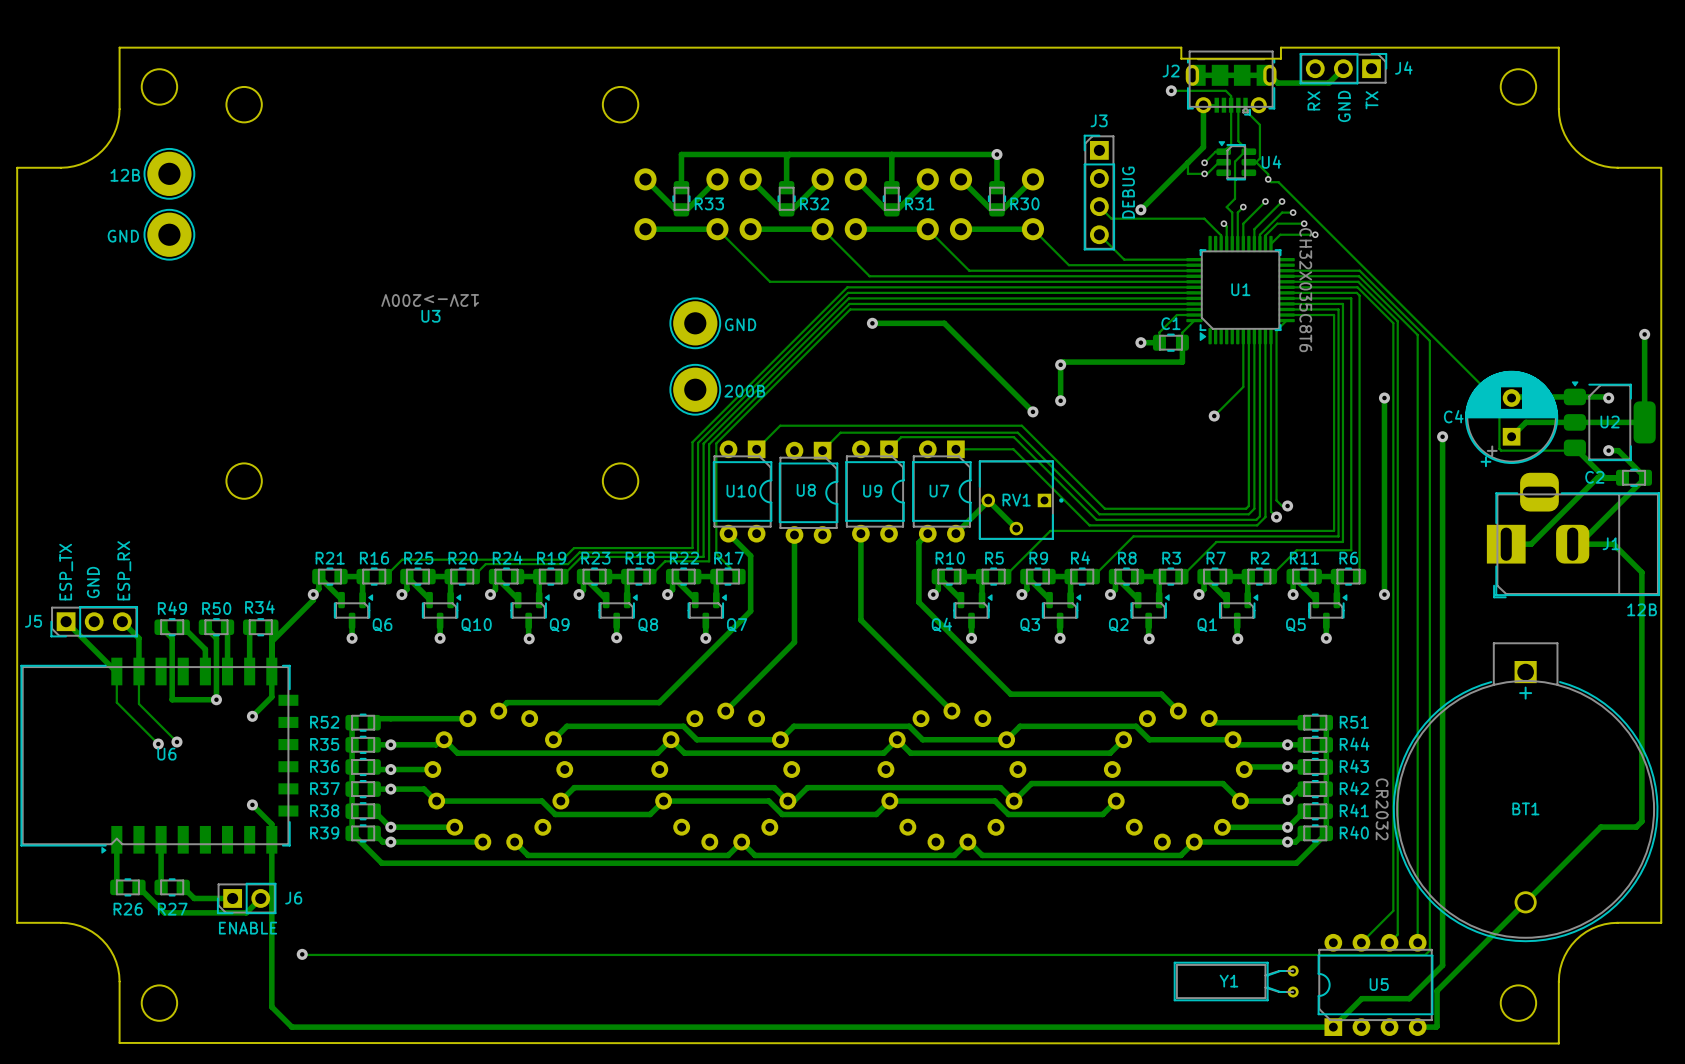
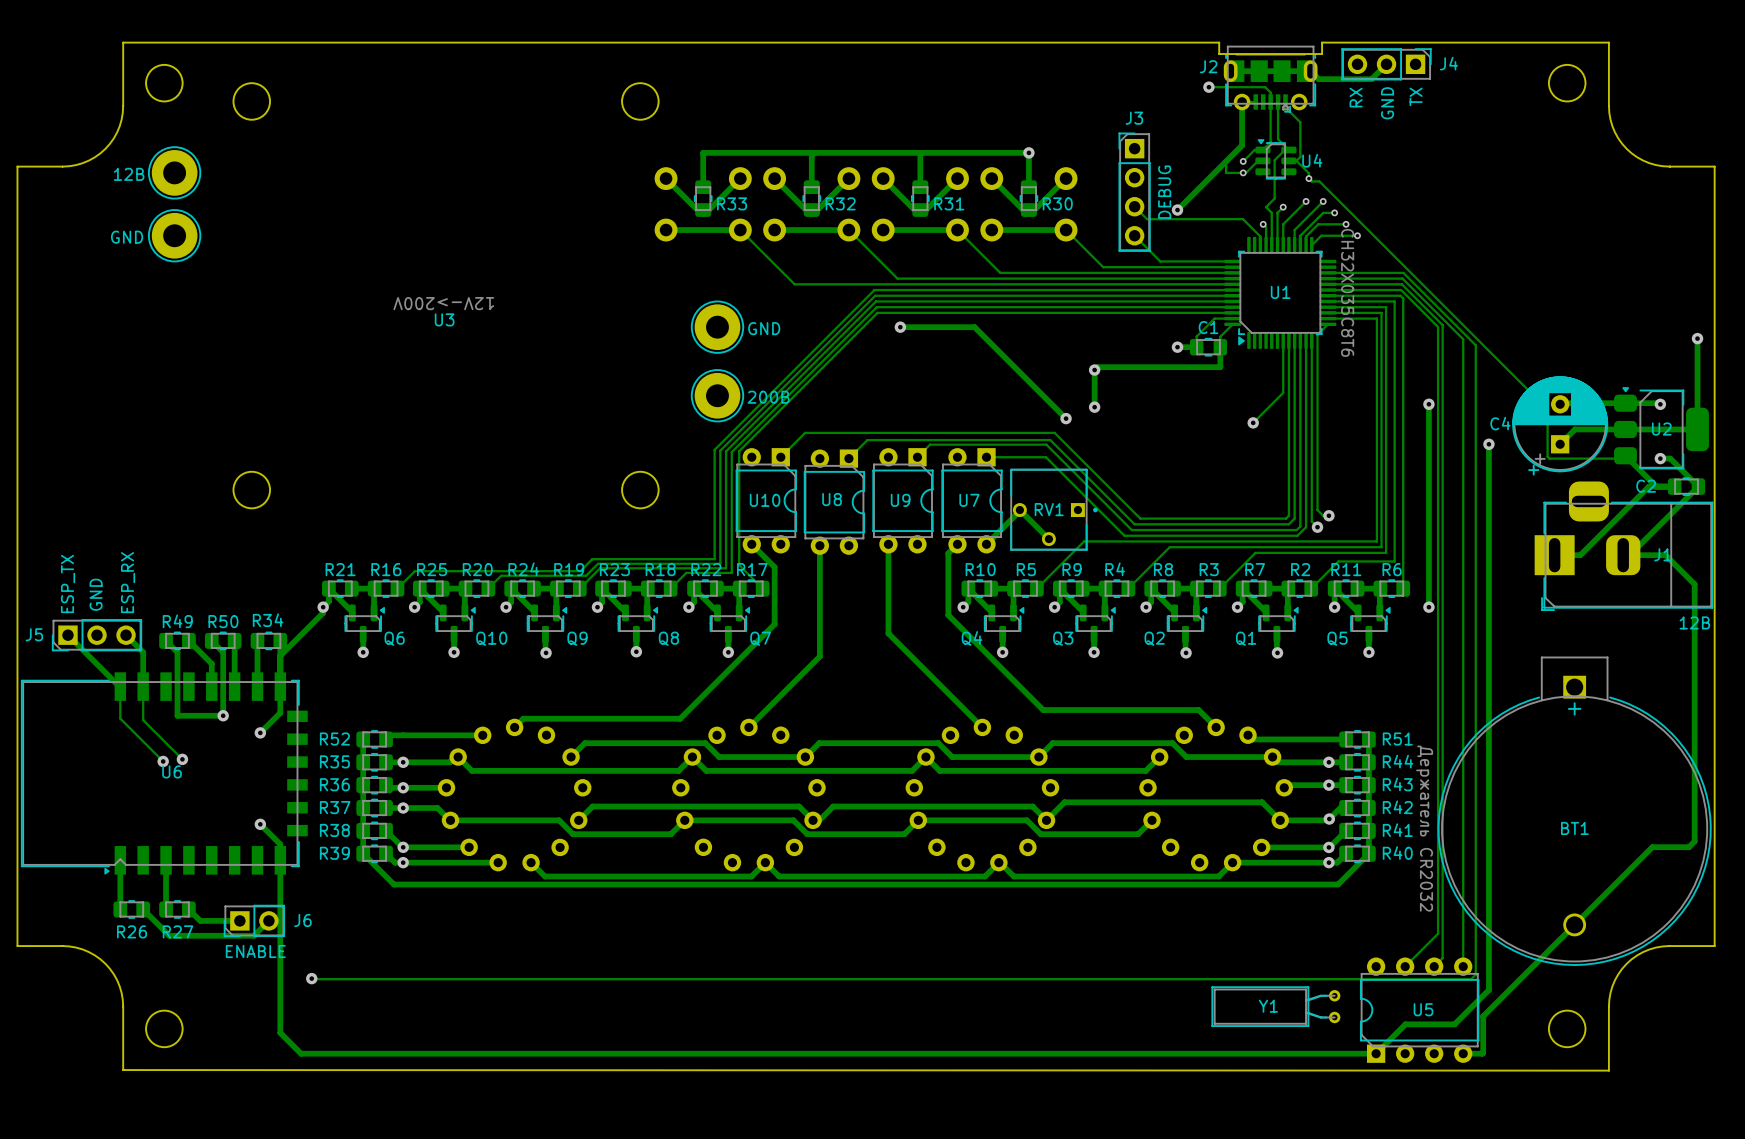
BT1 value: CR2032 (1382, 809) -> Держатель CR2032 (1424, 828)

